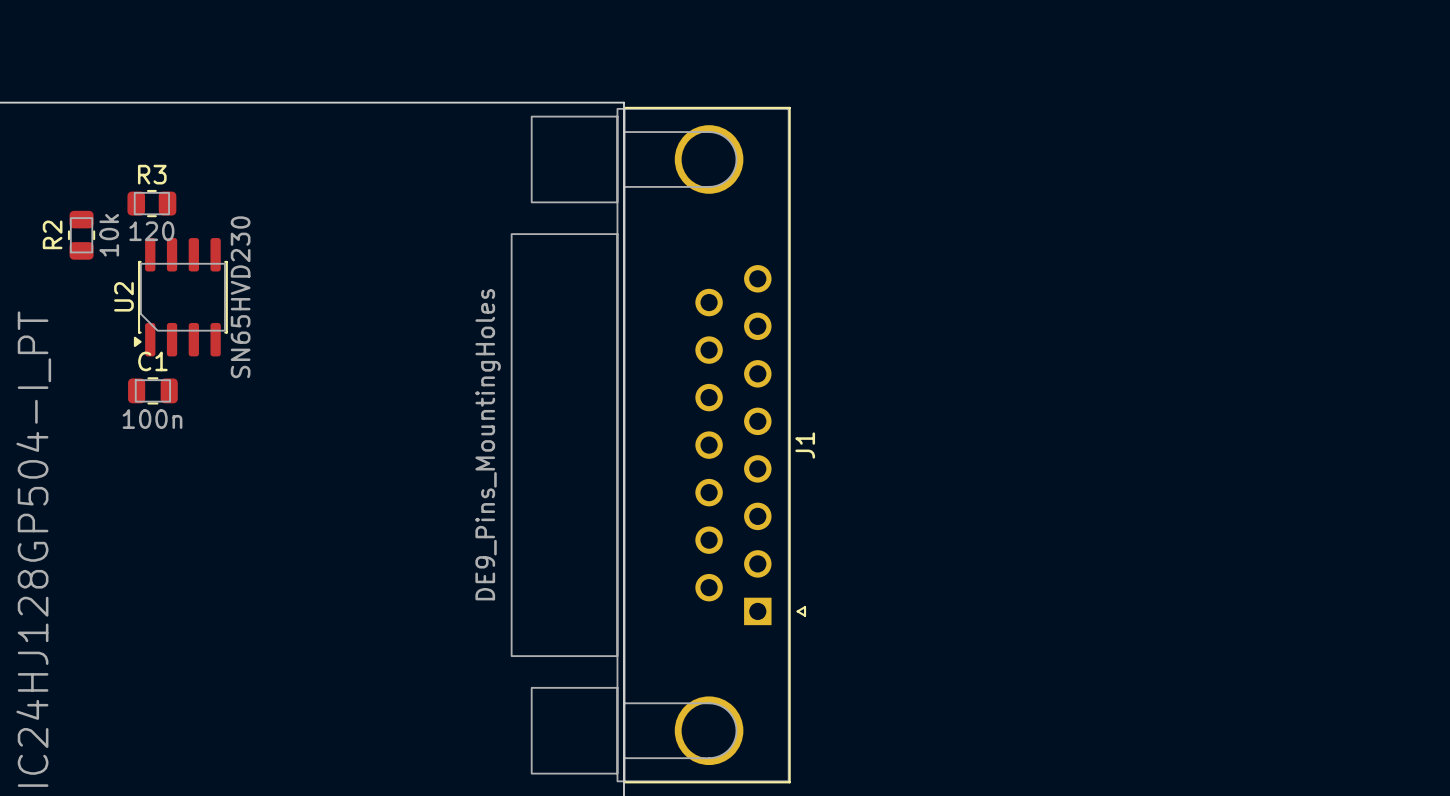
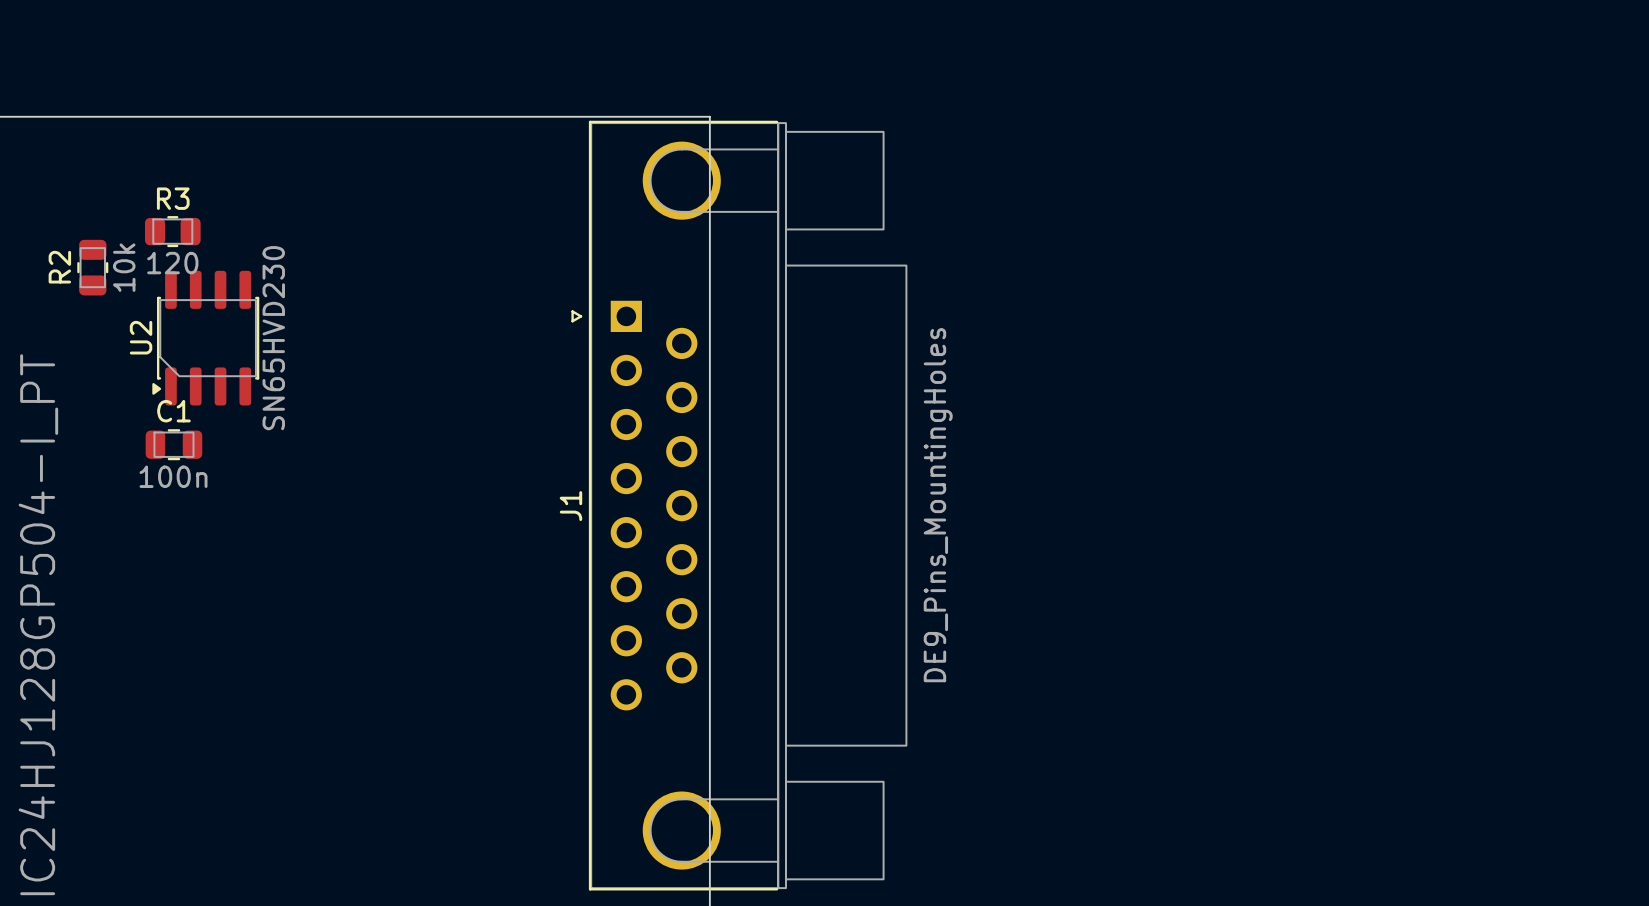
J1 rotation: 0° (658, 445) -> 180° (739, 505)

